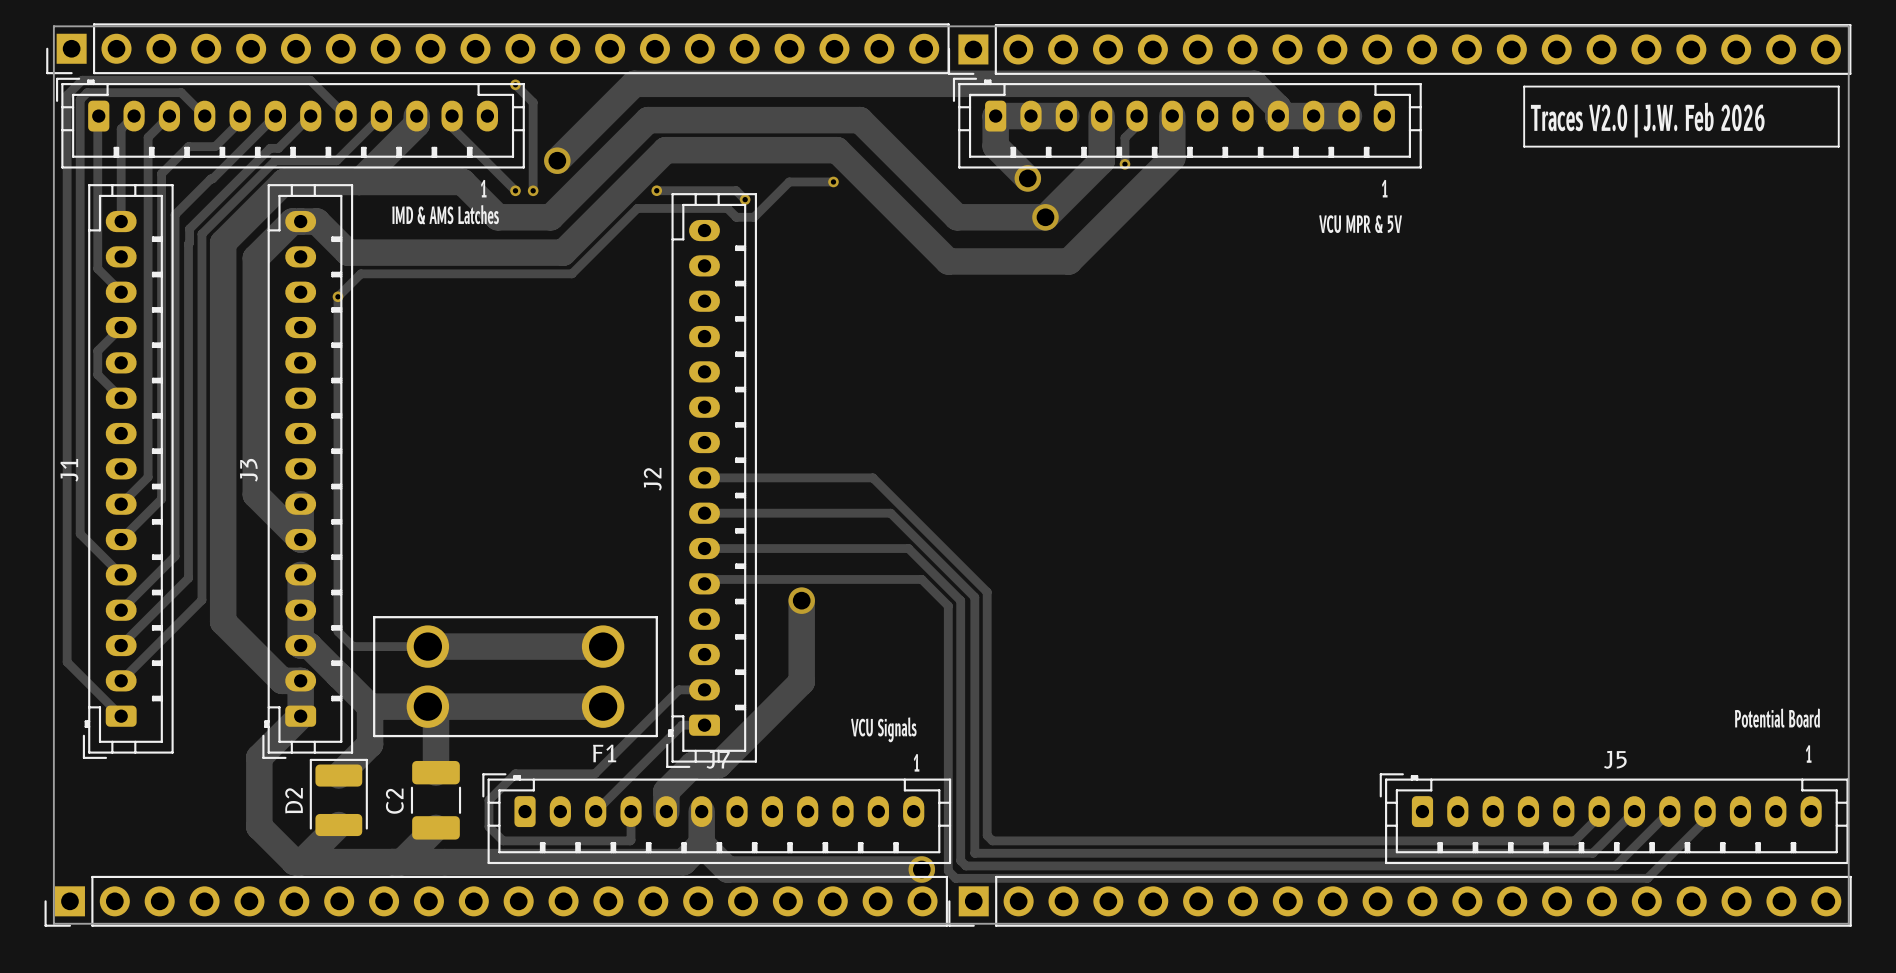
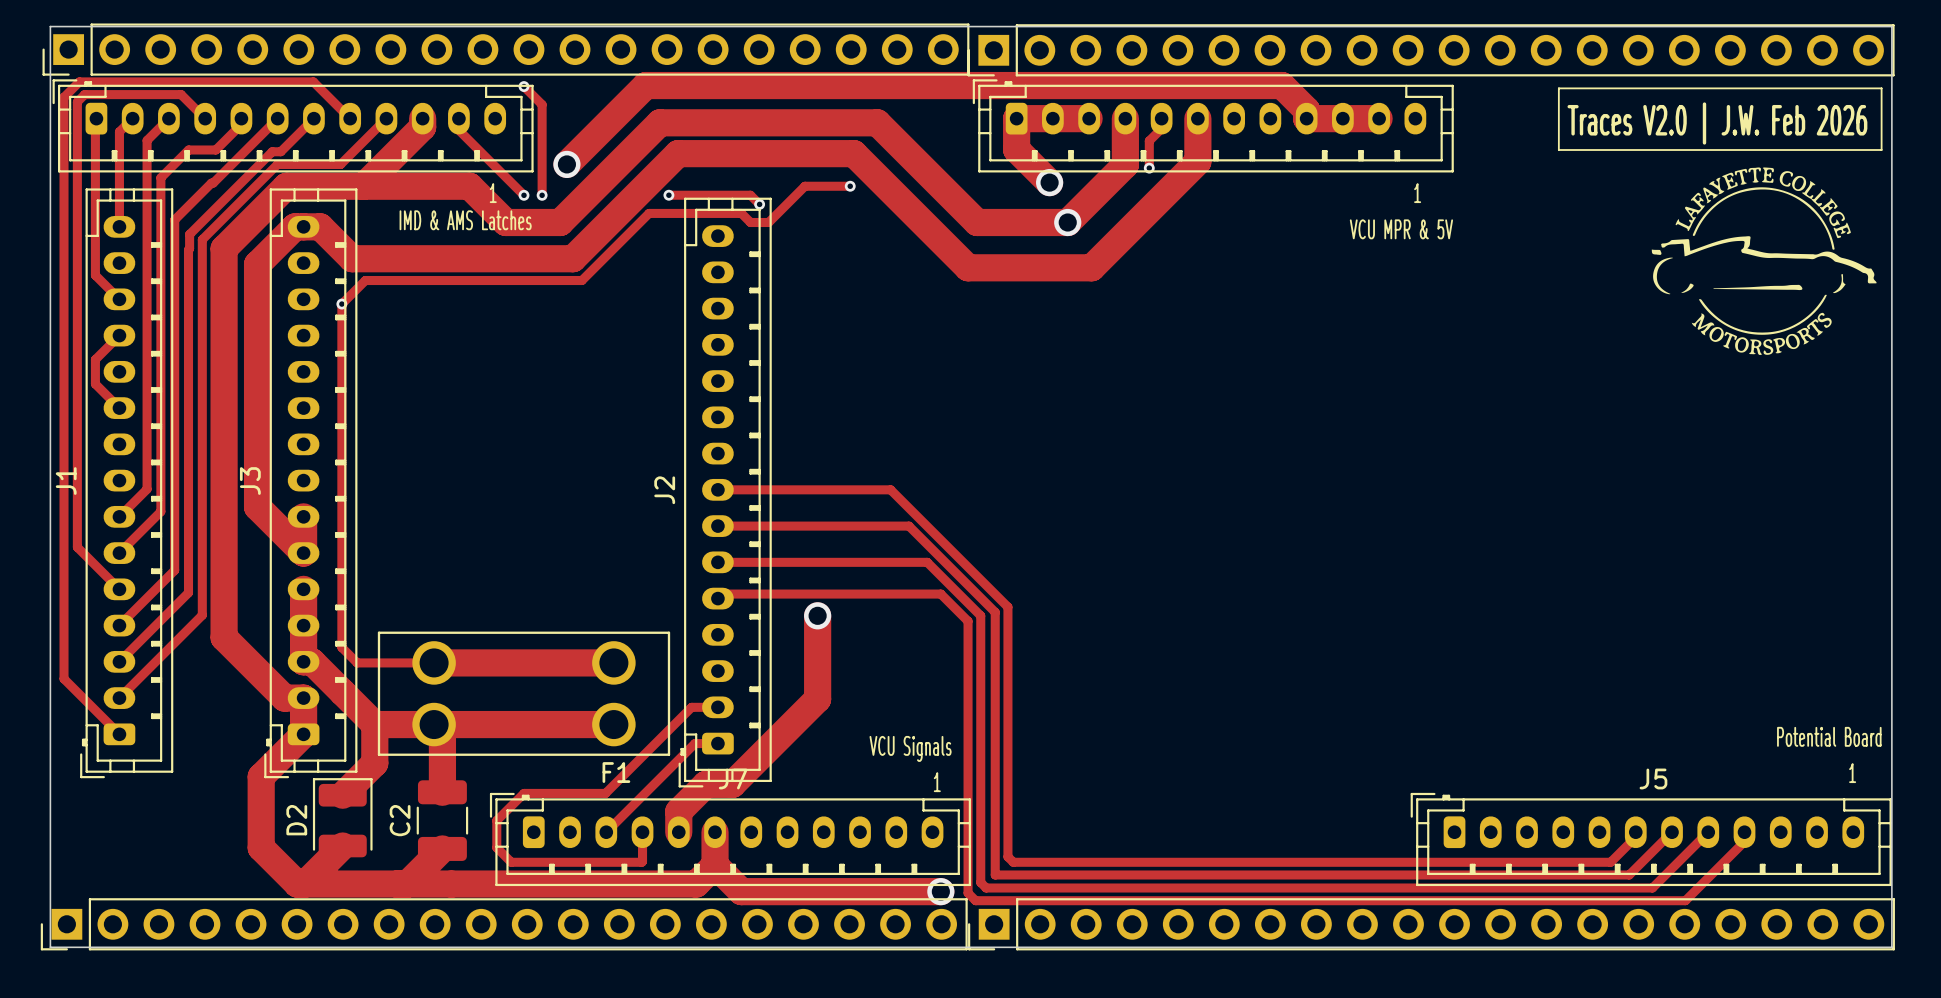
drawing: none -> [1651, 167, 1877, 355]

